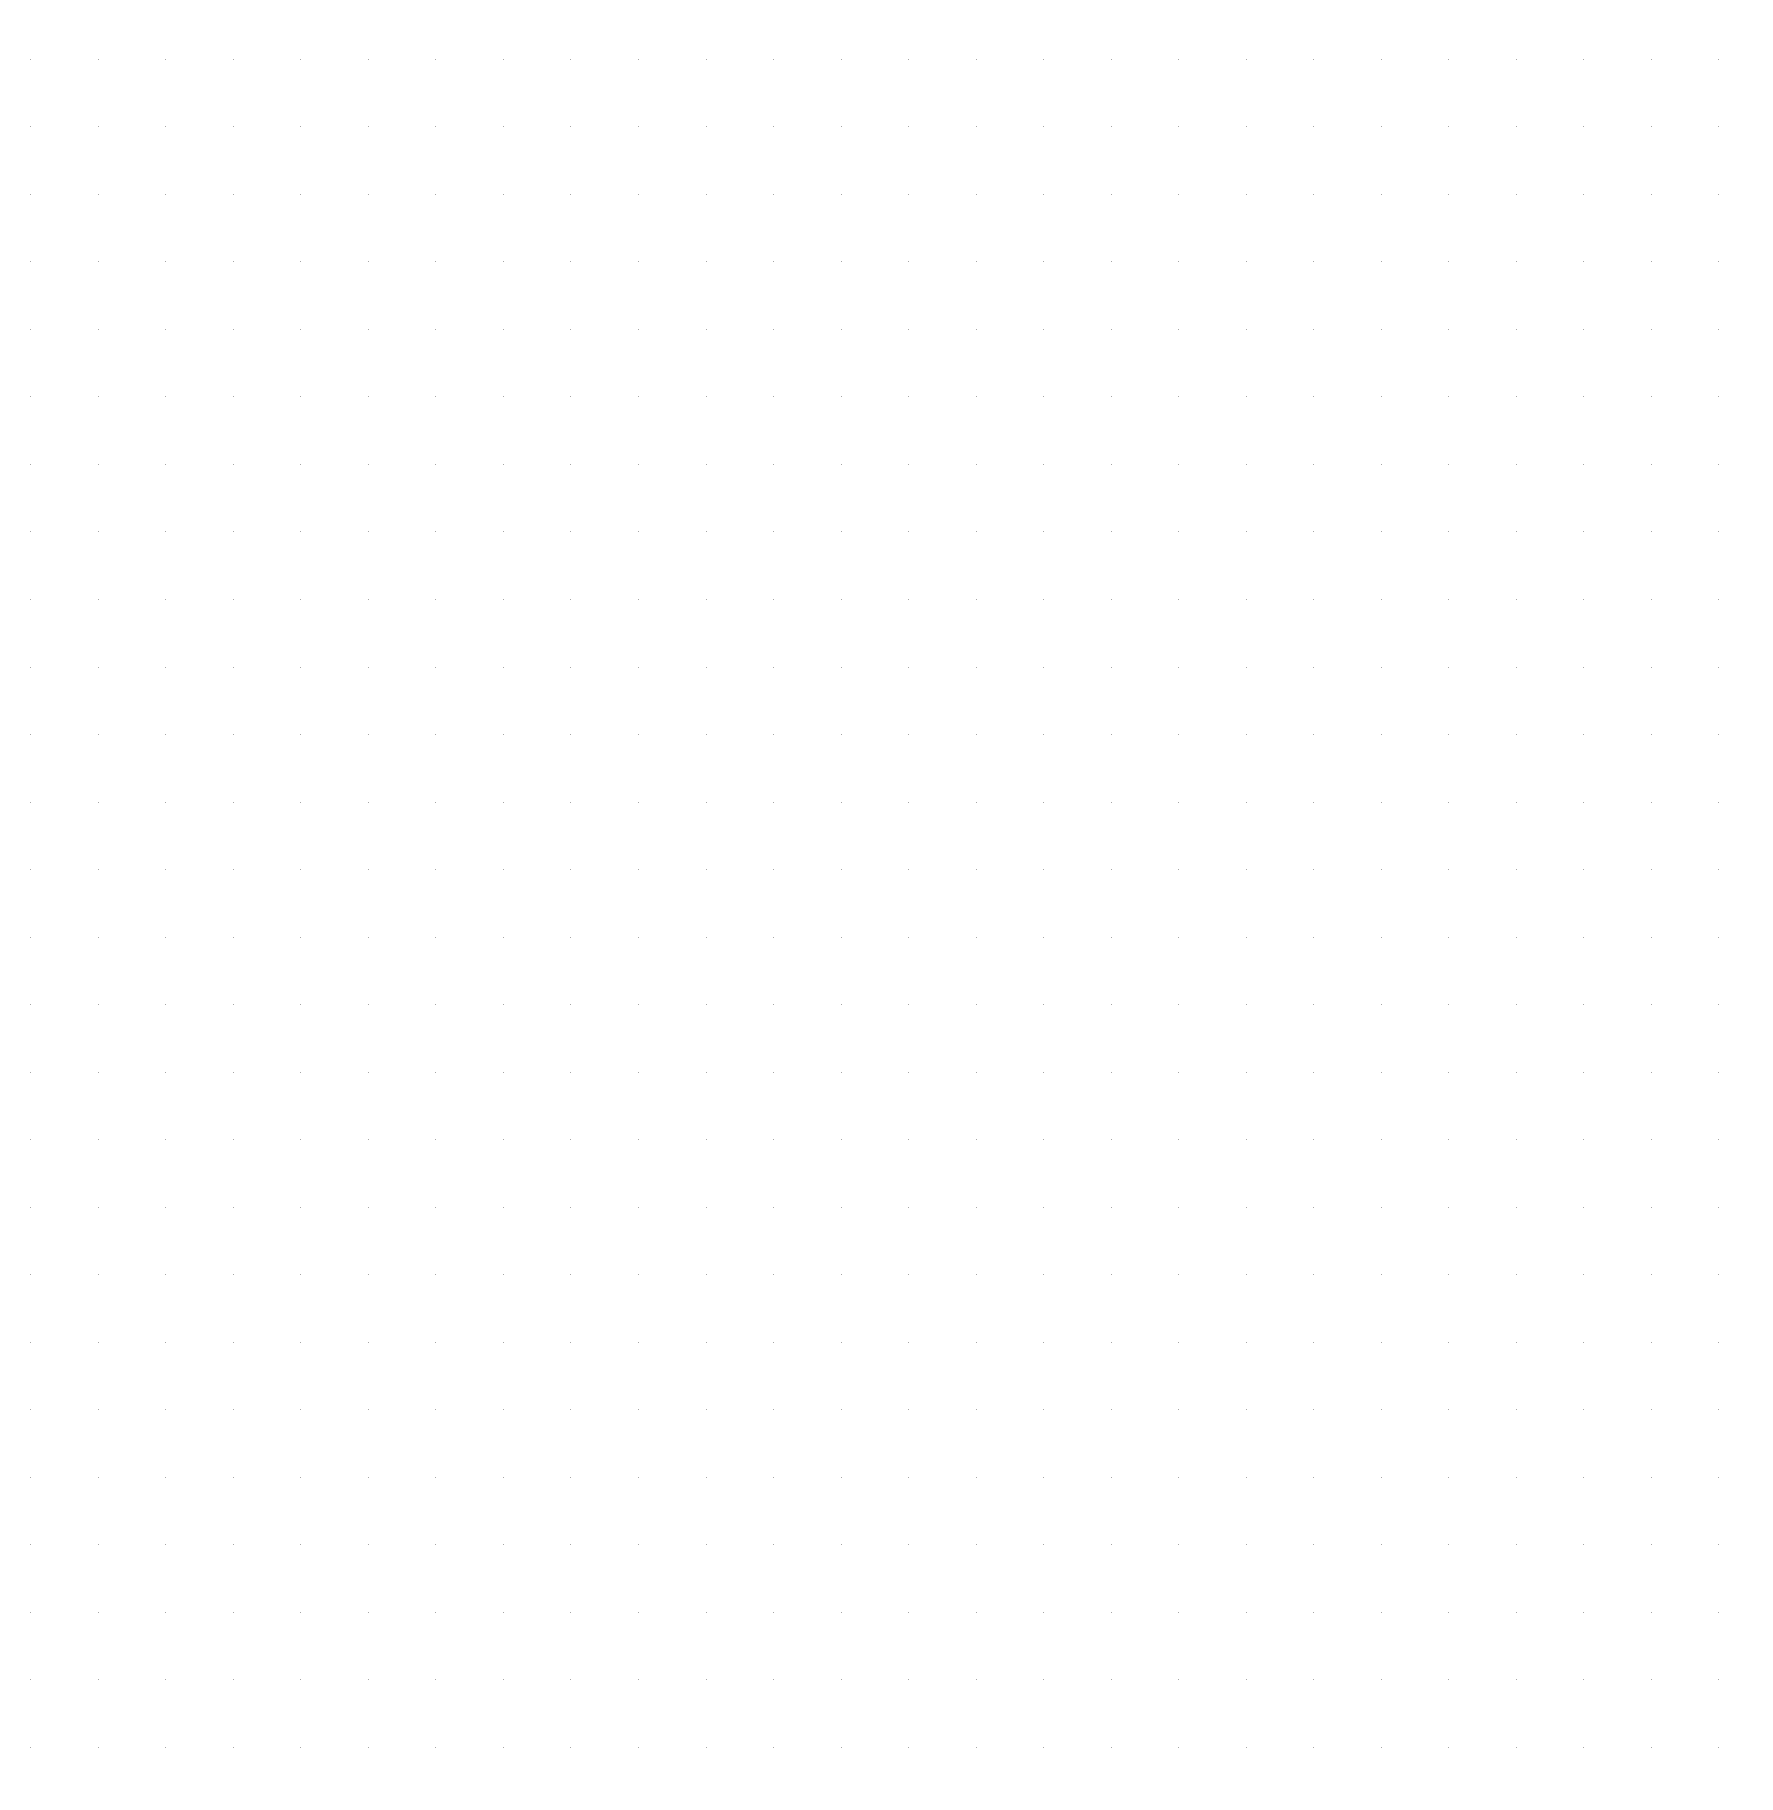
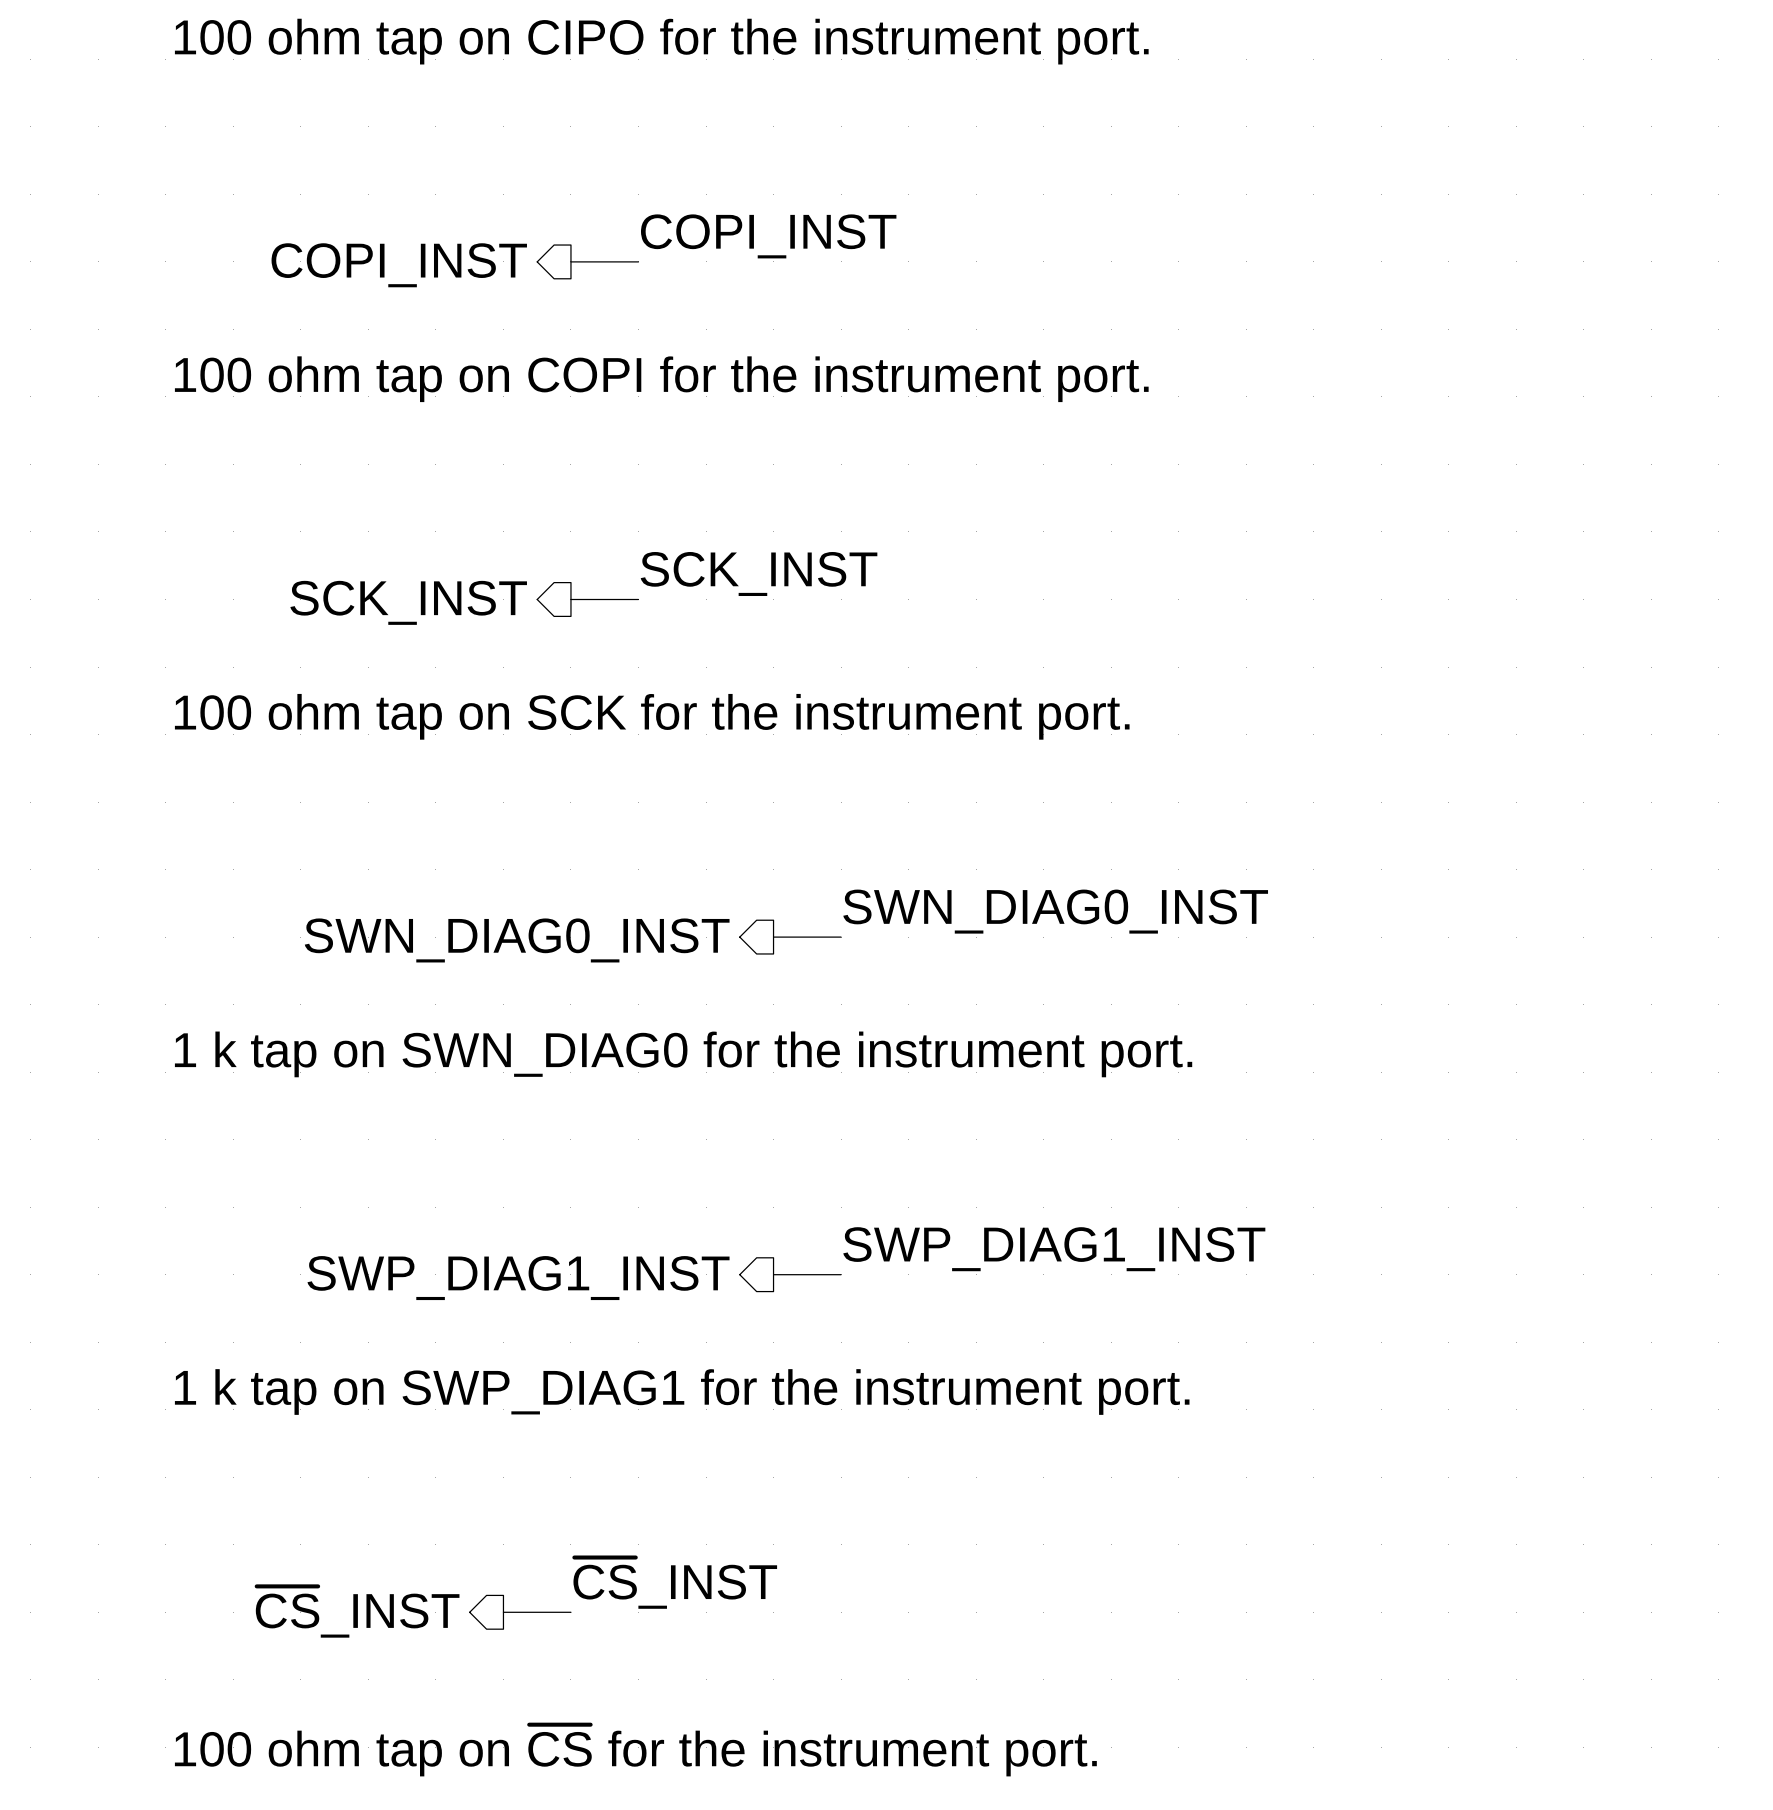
text: none -> 100 ohm tap on CIPO for the instrument port. (661, 41)
label: none -> COPI_INST (768, 236)
wire: none -> (570, 261) (638, 261)
hierarchical label: none -> COPI_INST (399, 265)
text: none -> 100 ohm tap on COPI for the instrument port. (661, 379)
label: none -> SCK_INST (759, 573)
wire: none -> (570, 599) (638, 599)
hierarchical label: none -> SCK_INST (408, 602)
text: none -> 100 ohm tap on SCK for the instrument port. (652, 716)
label: none -> SWN_DIAG0_INST (1055, 911)
wire: none -> (773, 937) (841, 937)
hierarchical label: none -> SWN_DIAG0_INST (517, 940)
text: none -> 1 k tap on SWN_DIAG0 for the instrument port. (683, 1054)
label: none -> SWP_DIAG1_INST (1054, 1249)
wire: none -> (773, 1274) (841, 1274)
hierarchical label: none -> SWP_DIAG1_INST (518, 1278)
text: none -> 1 k tap on SWP_DIAG1 for the instrument port. (682, 1392)
label: none -> ~{CS}_INST (675, 1583)
hierarchical label: none -> ~{CS}_INST (357, 1612)
wire: none -> (503, 1612) (570, 1612)
text: none -> 100 ohm tap on ~{CS} for the instrument port. (635, 1750)

